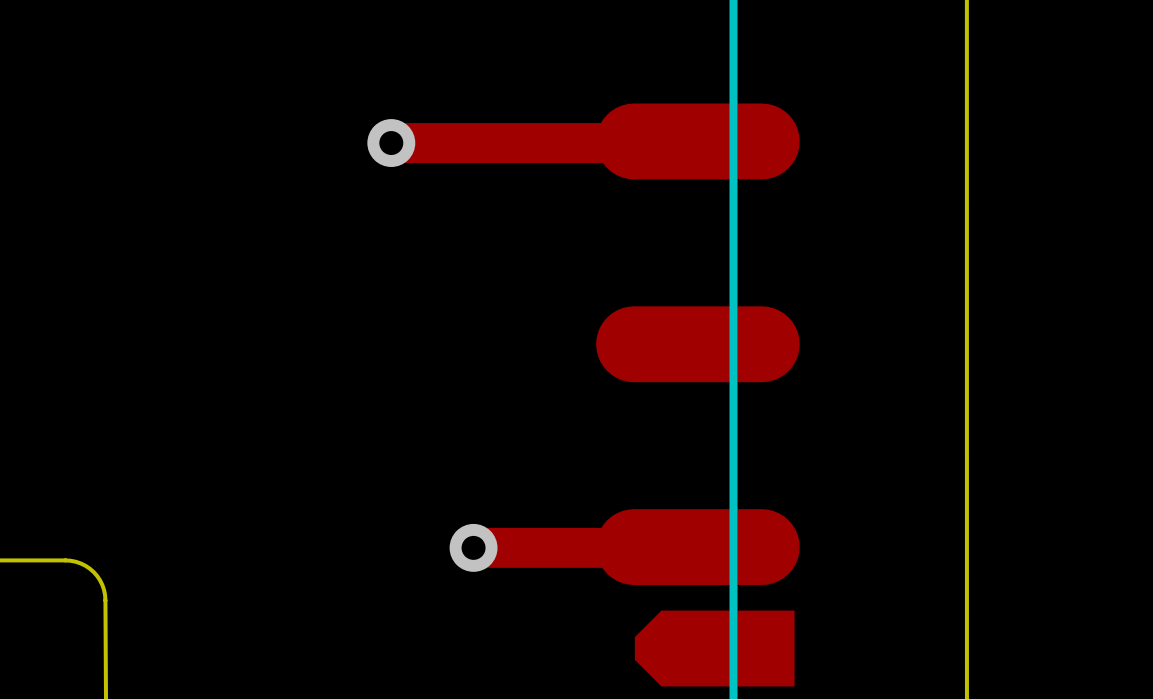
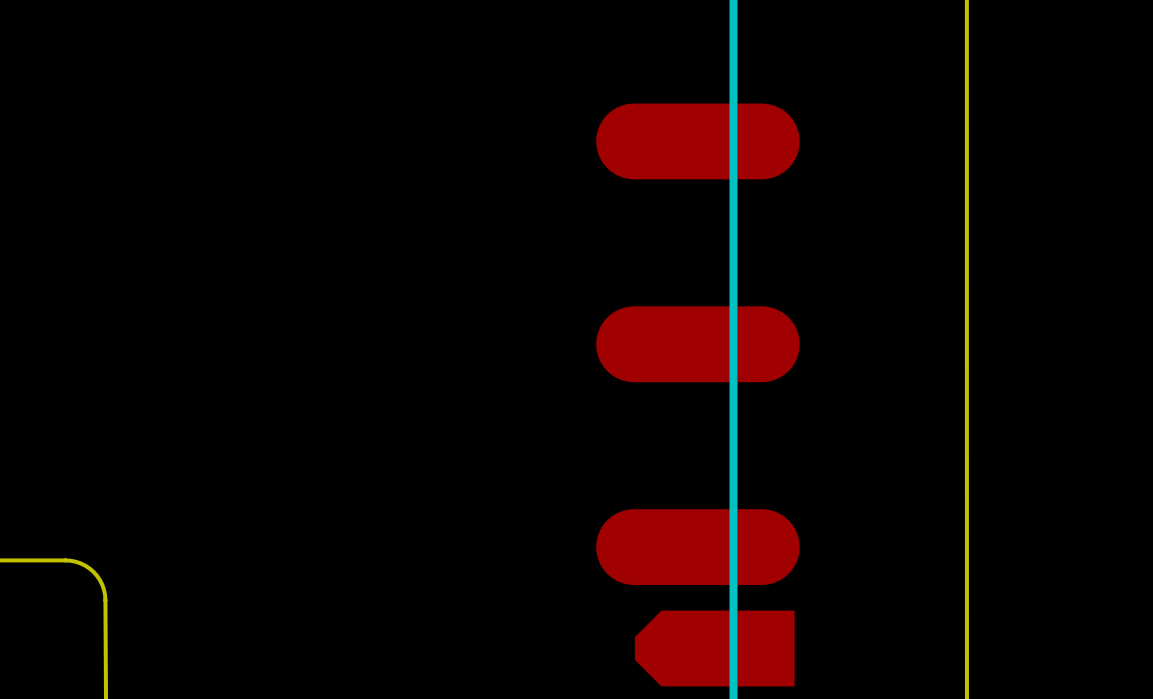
track: (391, 143) (632, 143) -> none
via: (391, 143) -> none
track: (473, 547) (633, 547) -> none
via: (473, 547) -> none

